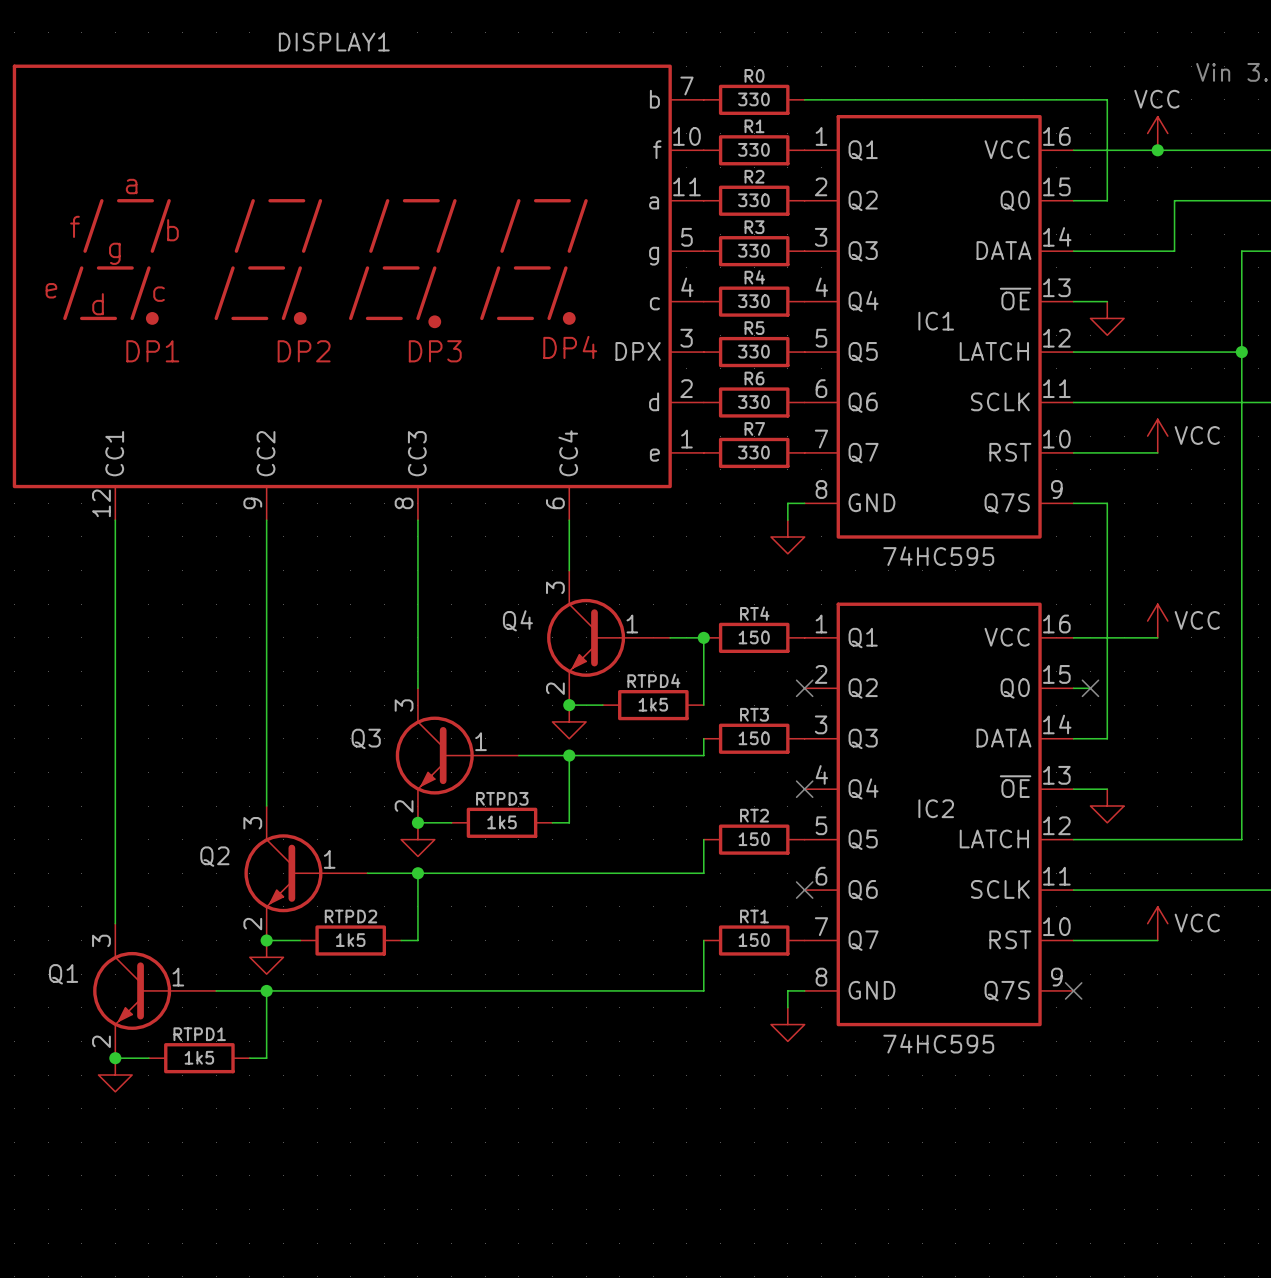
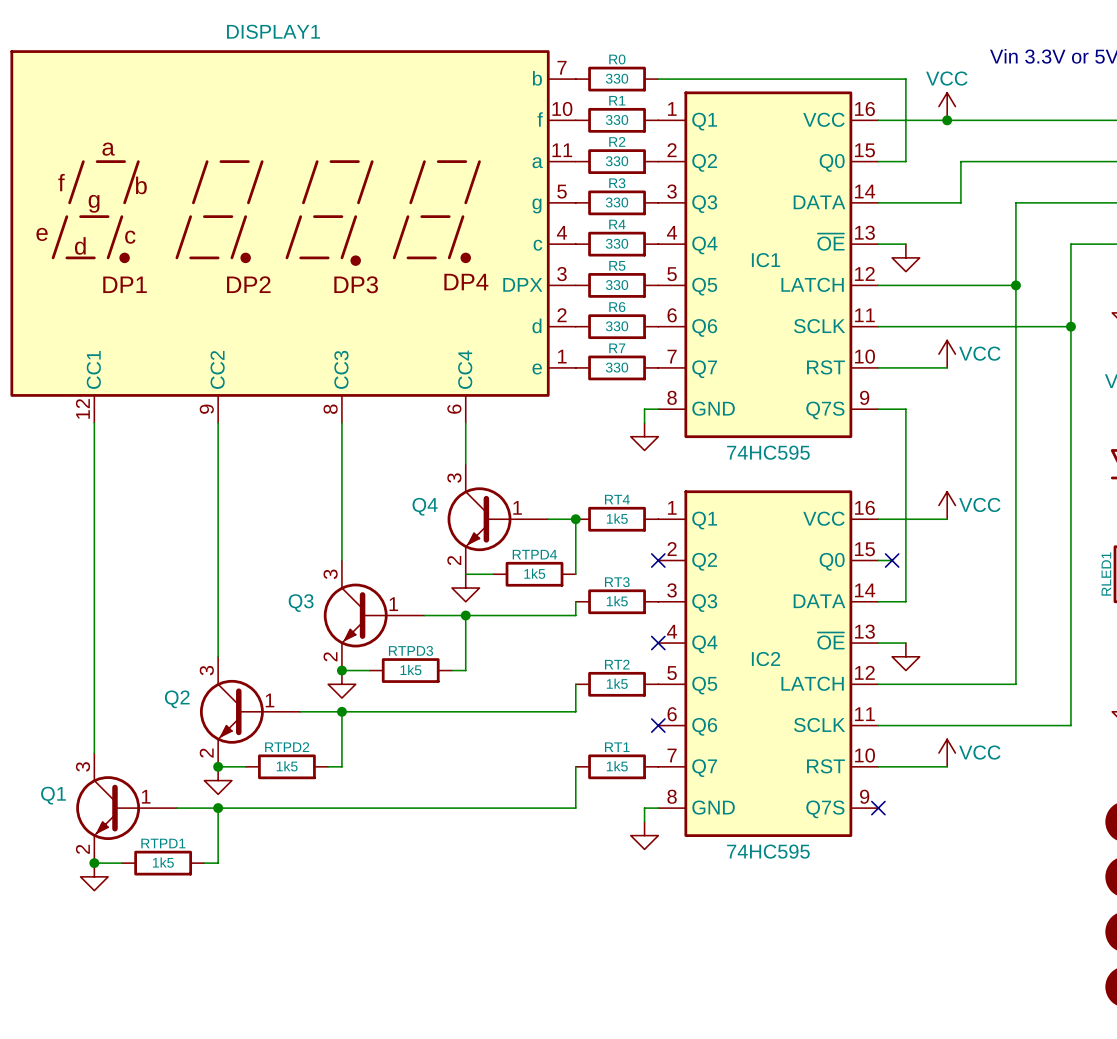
RT4 value: 150 (754, 637) -> 1k5 (617, 518)
junction: (569, 705) -> none
RT3 value: 150 (754, 738) -> 1k5 (617, 601)
RT2 value: 150 (754, 839) -> 1k5 (617, 683)
RT1 value: 150 (754, 940) -> 1k5 (617, 766)

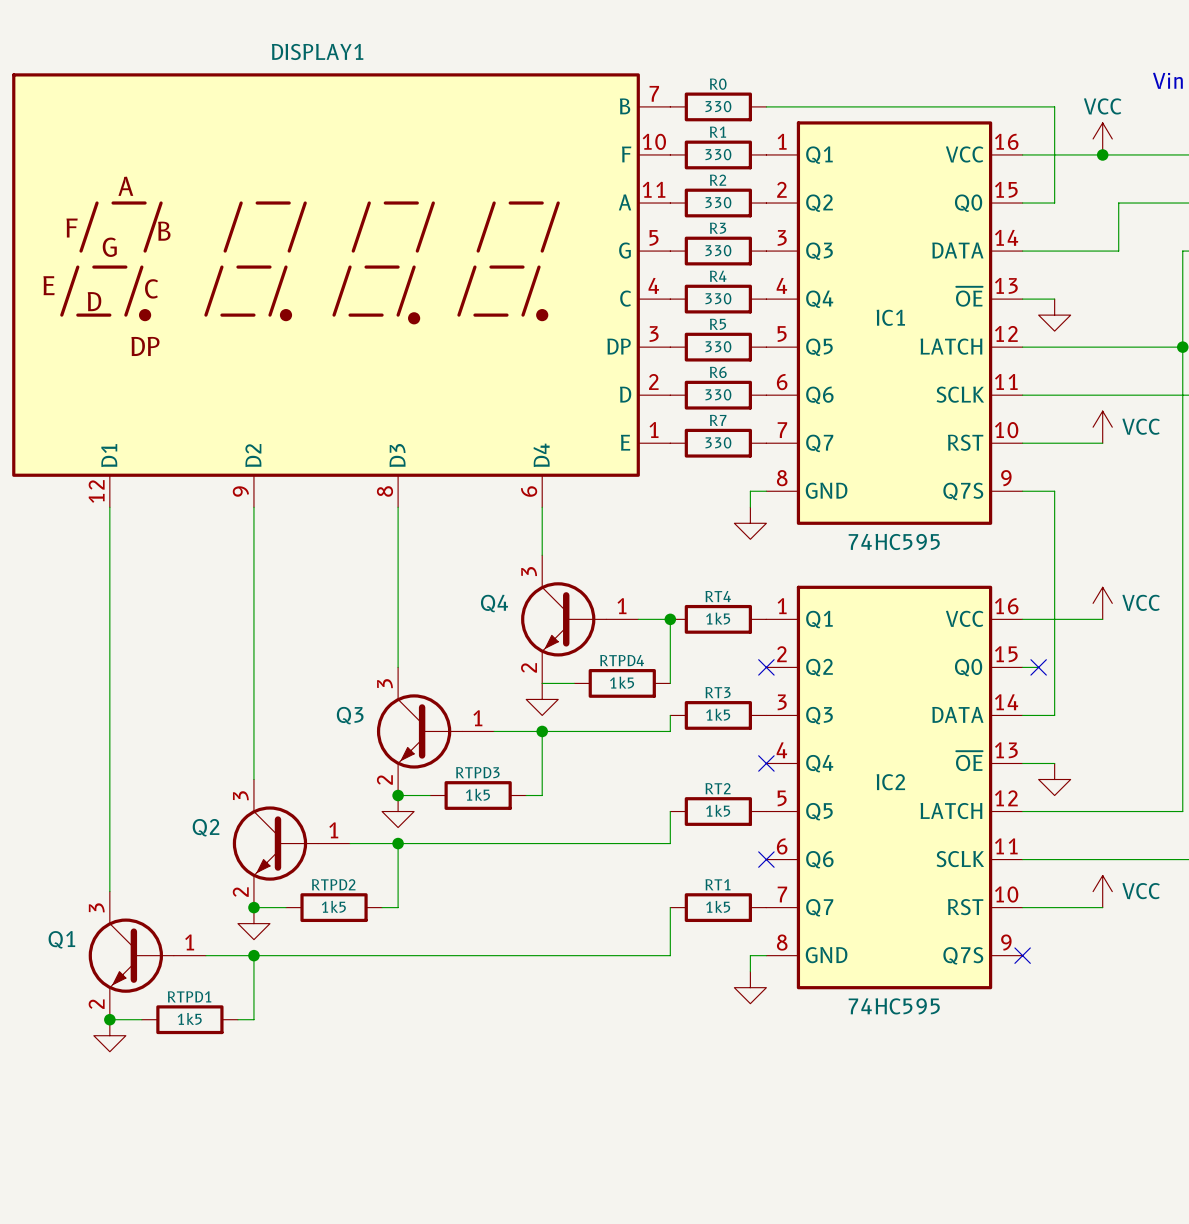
DISPLAY1 symbol: [10, 50, 576, 423] -> [12, 73, 671, 508]
Q4 symbol: [447, 464, 549, 575] -> [521, 555, 639, 684]
Q3 symbol: [323, 560, 425, 671] -> [376, 667, 495, 796]
Q2 symbol: [199, 656, 301, 767] -> [232, 779, 351, 908]
Q1 symbol: [76, 753, 177, 864] -> [88, 891, 206, 1020]

